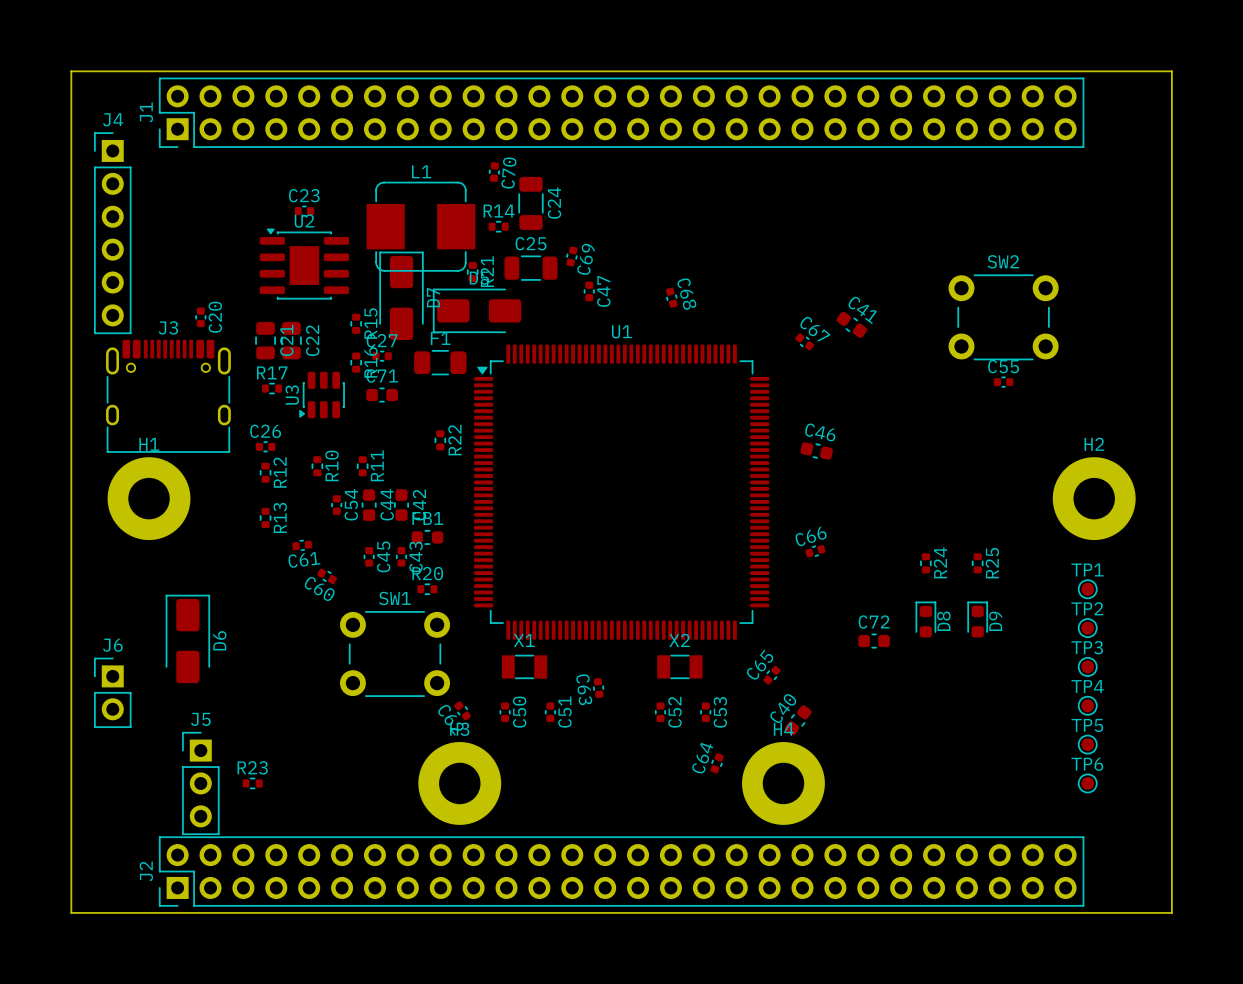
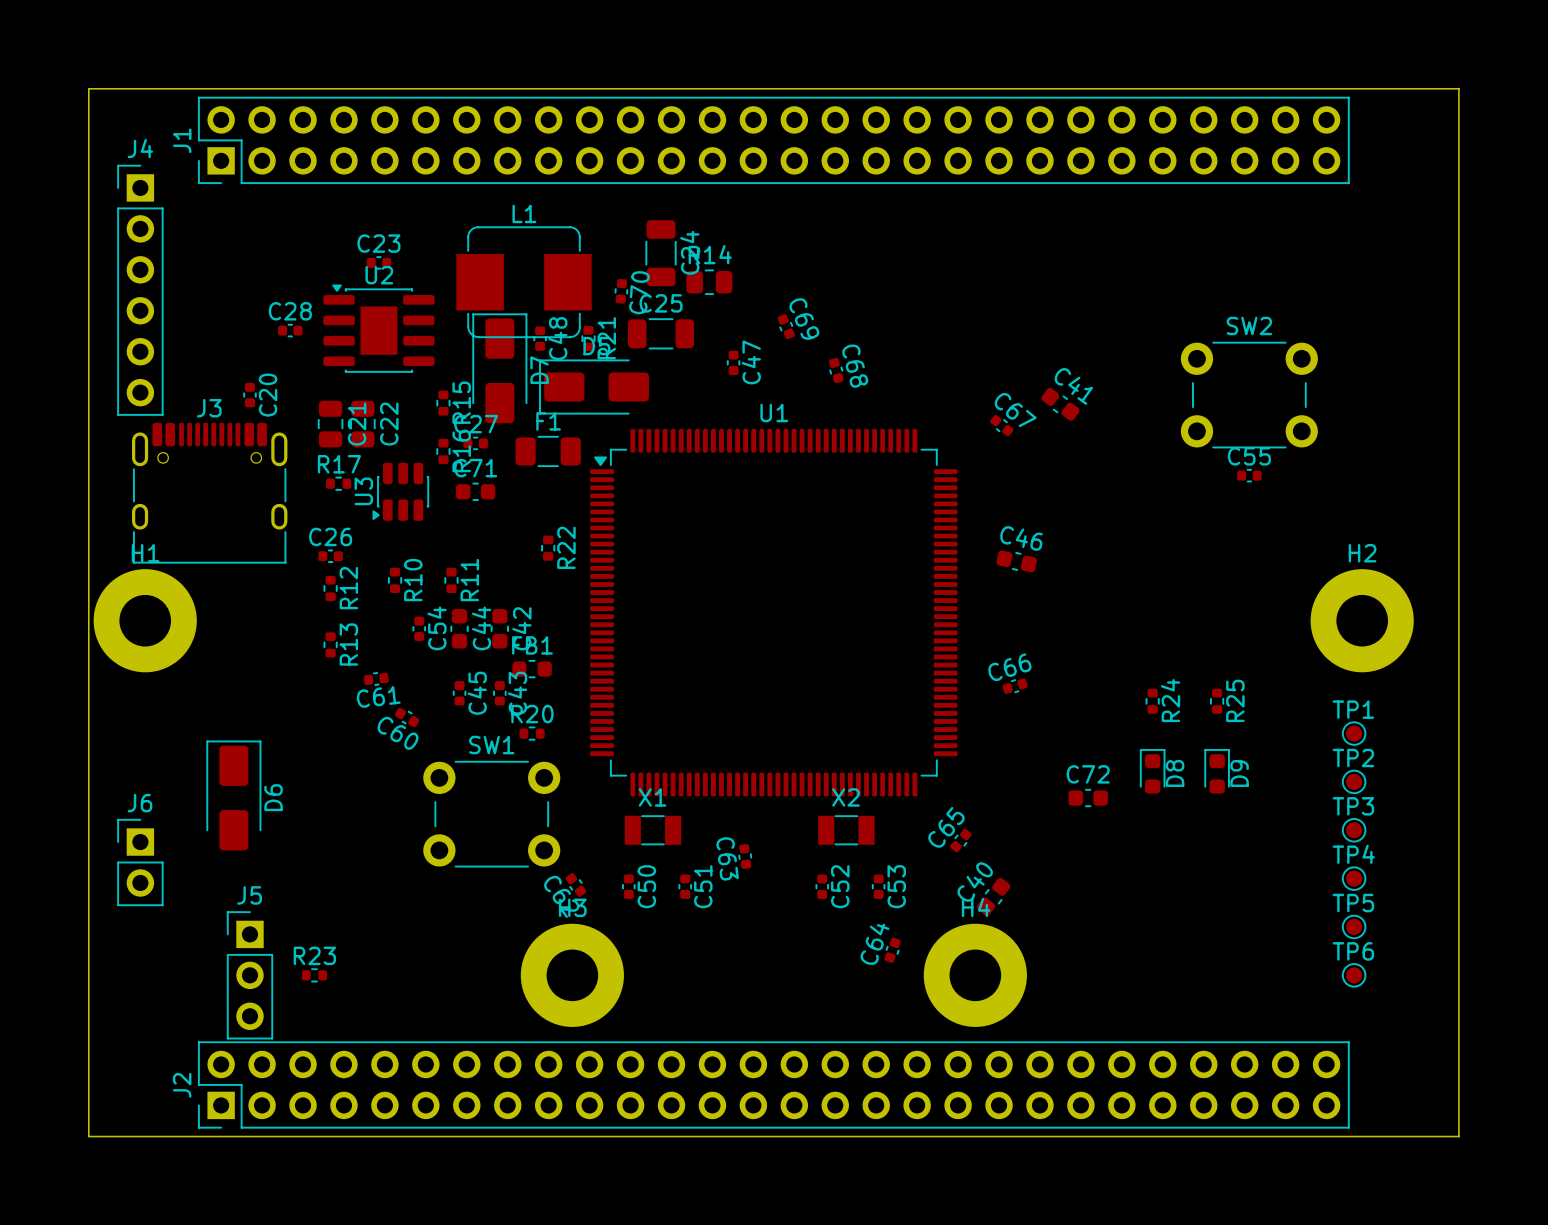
C70 position: (494, 172) -> (621, 291)
R14 footprint: [488, 221, 509, 233] -> [686, 269, 733, 296]
C69 rotation: 0° (571, 256) -> 35° counterclockwise (786, 326)
C69 position: (571, 256) -> (786, 326)
C28: none -> (290, 330)
C48: none -> (540, 338)
H1 position: (149, 498) -> (145, 620)

